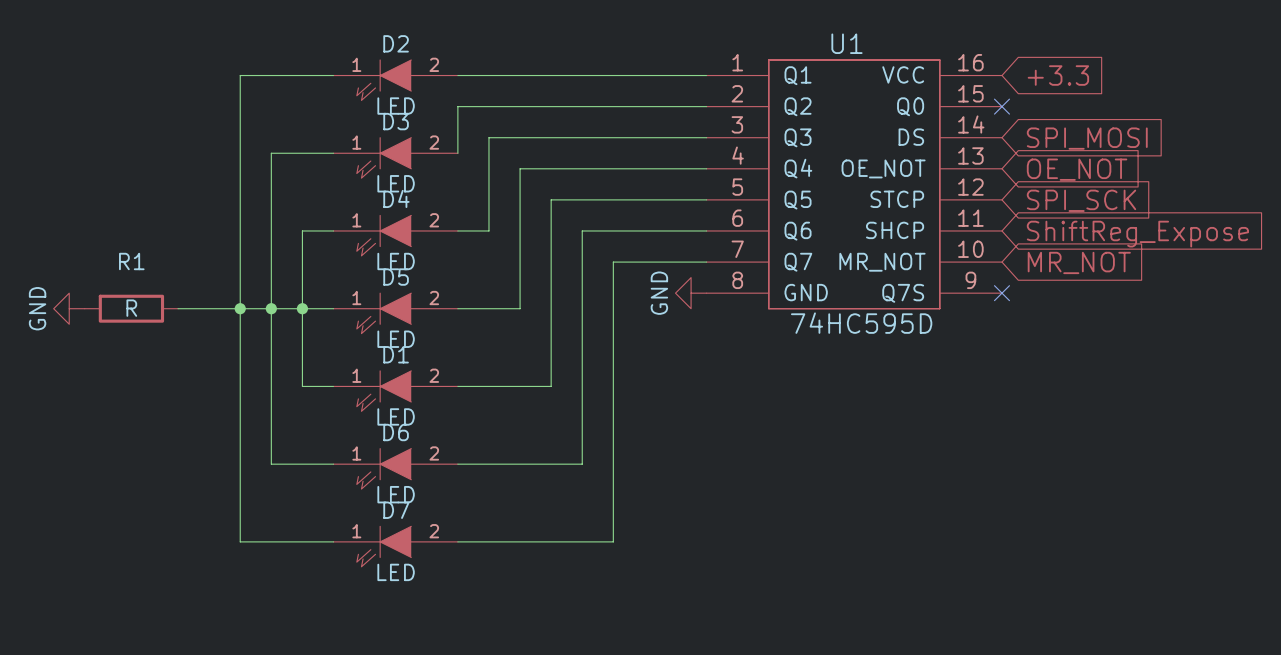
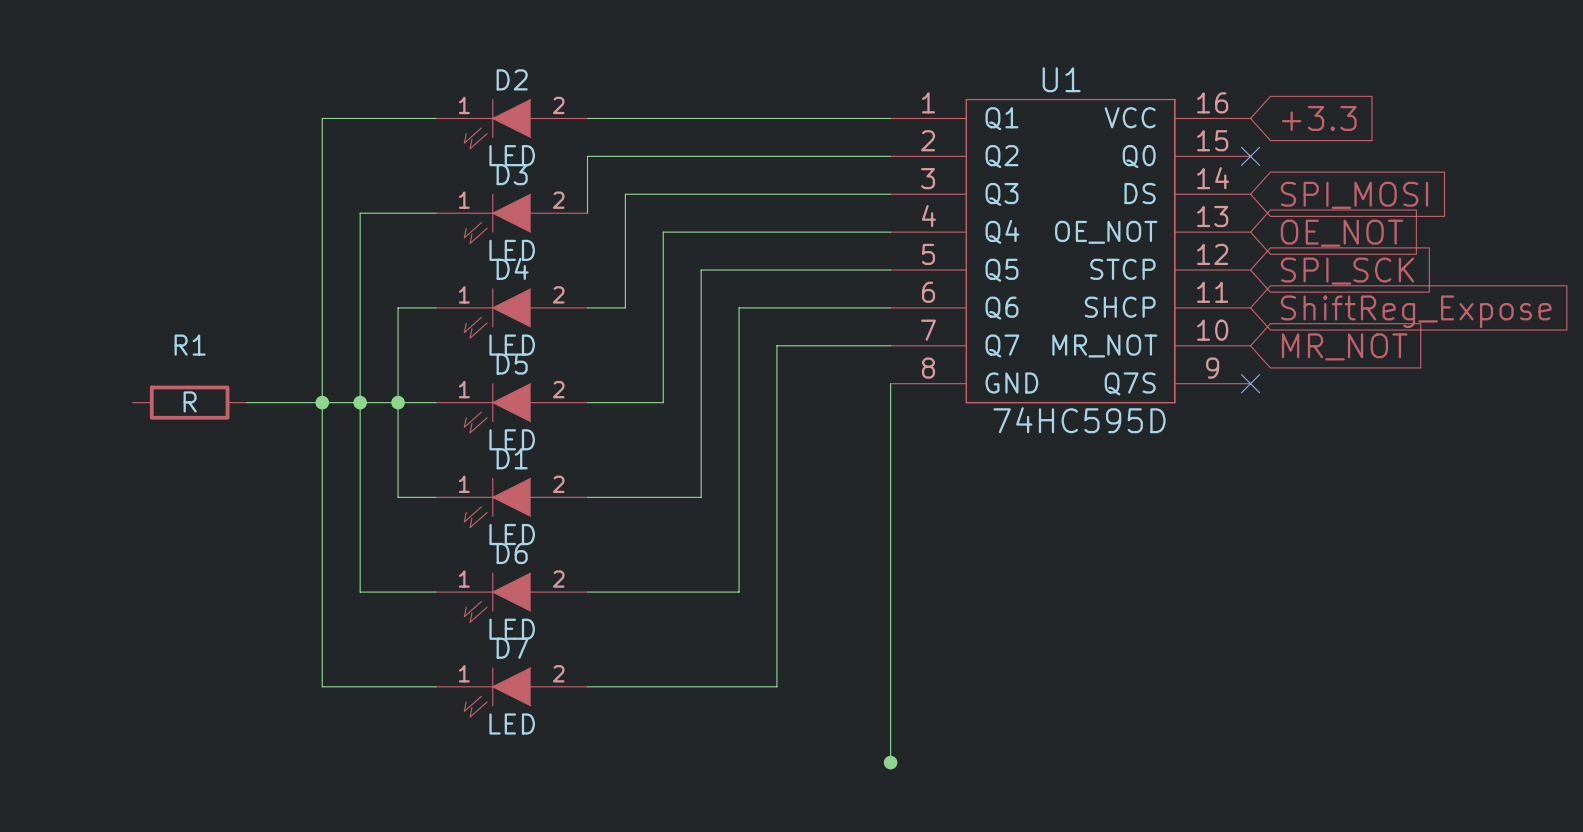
power symbol: GND (691, 293) -> none
wire: none -> (890, 383) (890, 762)
power symbol: GND (69, 308) -> none
junction: none -> (890, 762)

